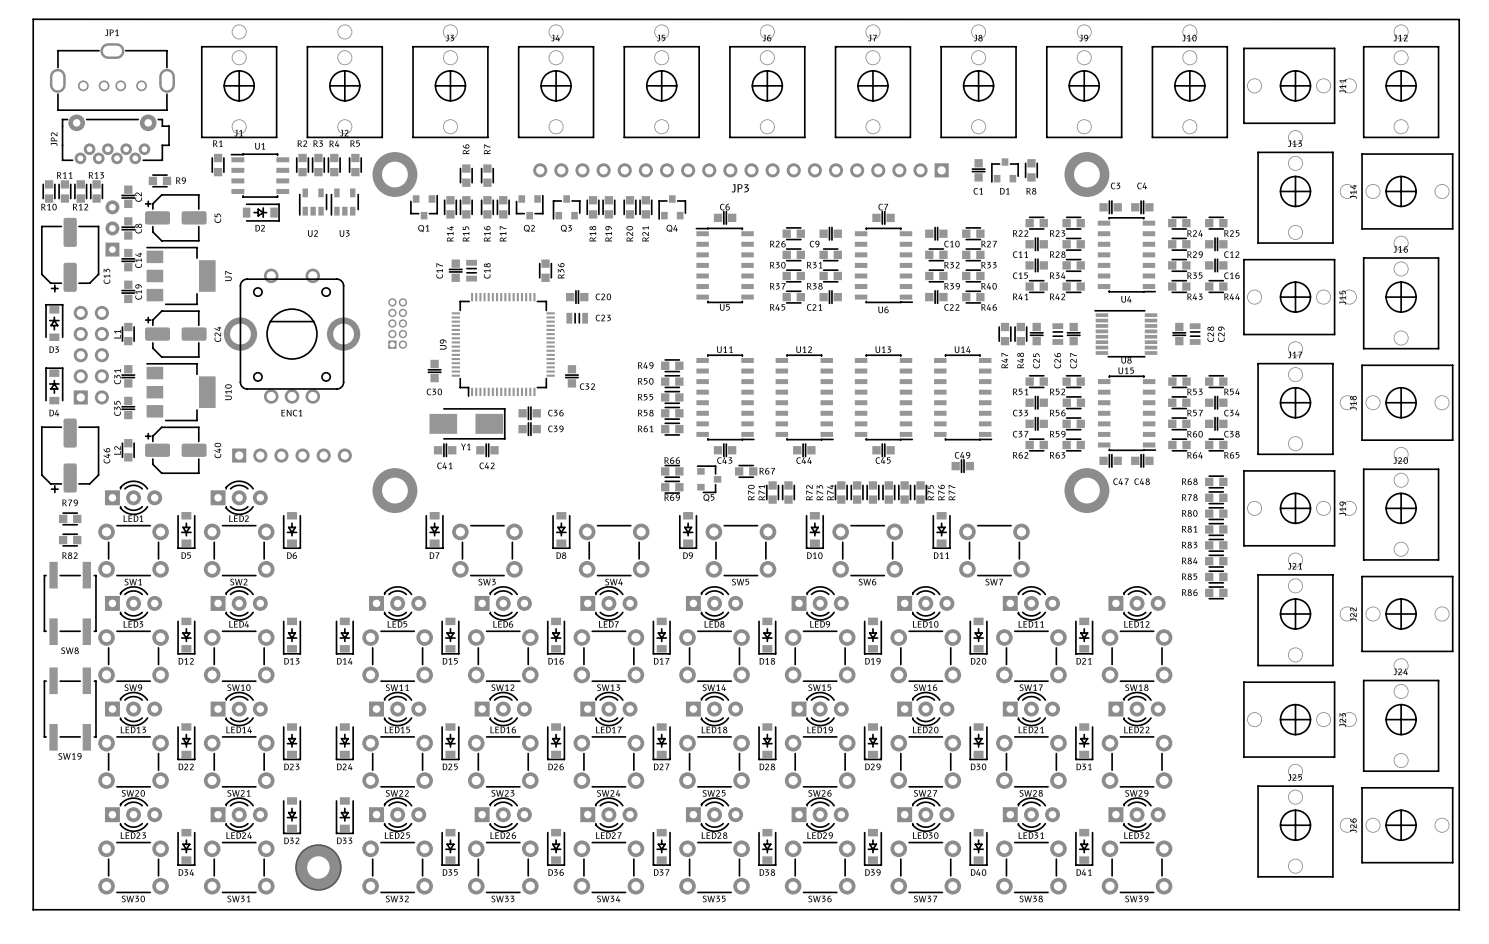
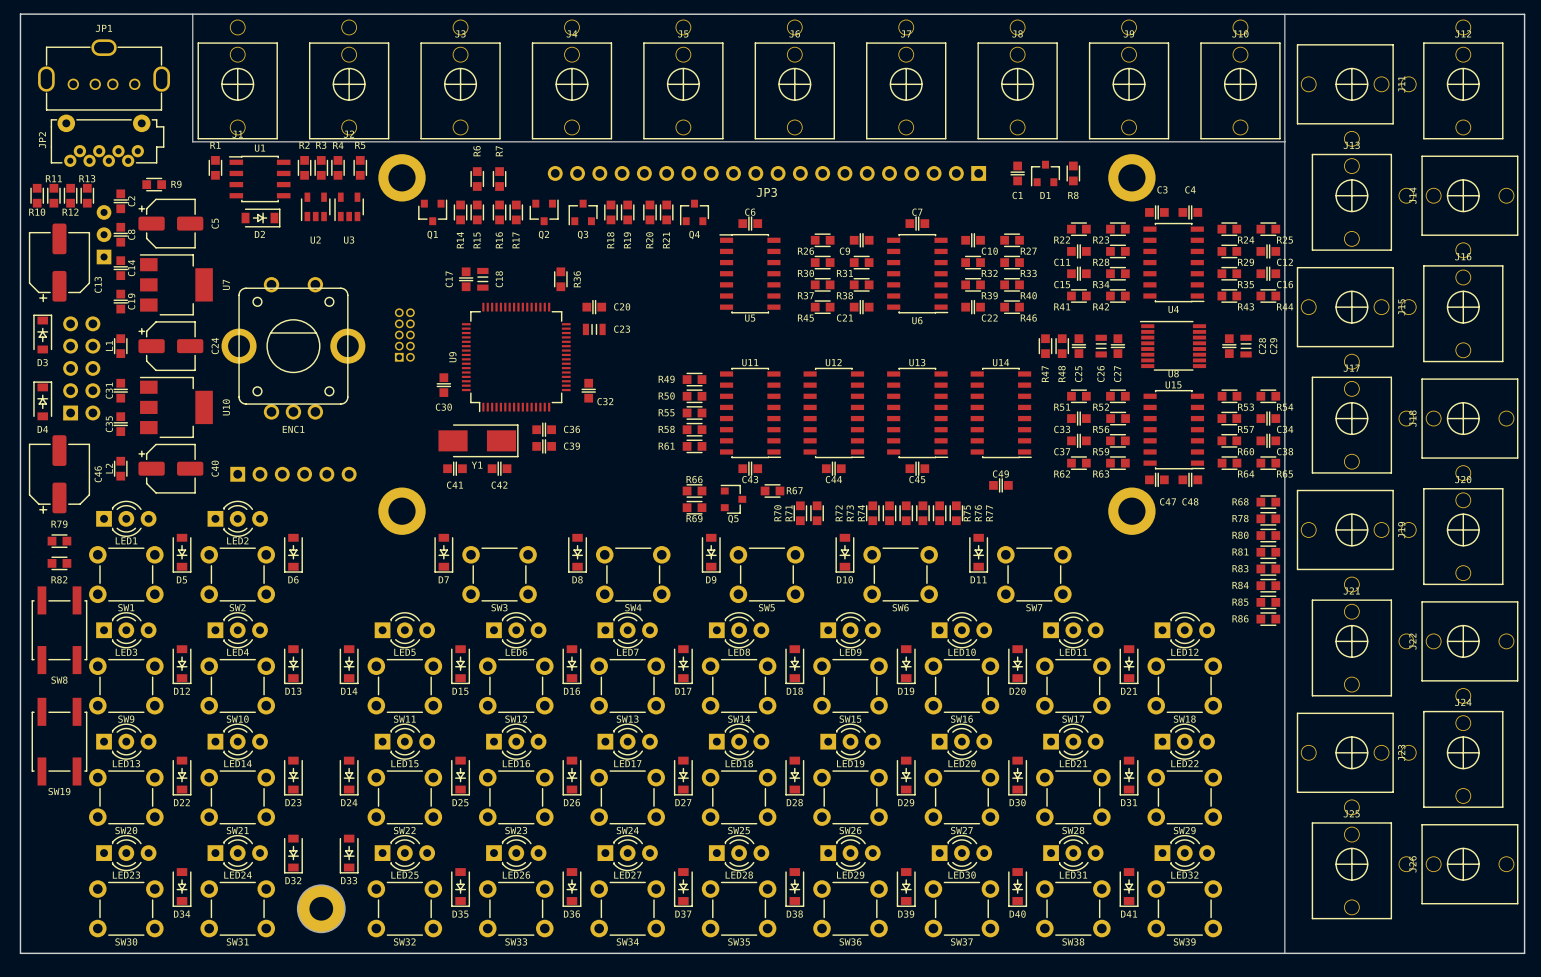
line: none -> (192, 14) (192, 141) (1284, 141)
line: none -> (1284, 14) (1284, 953)

